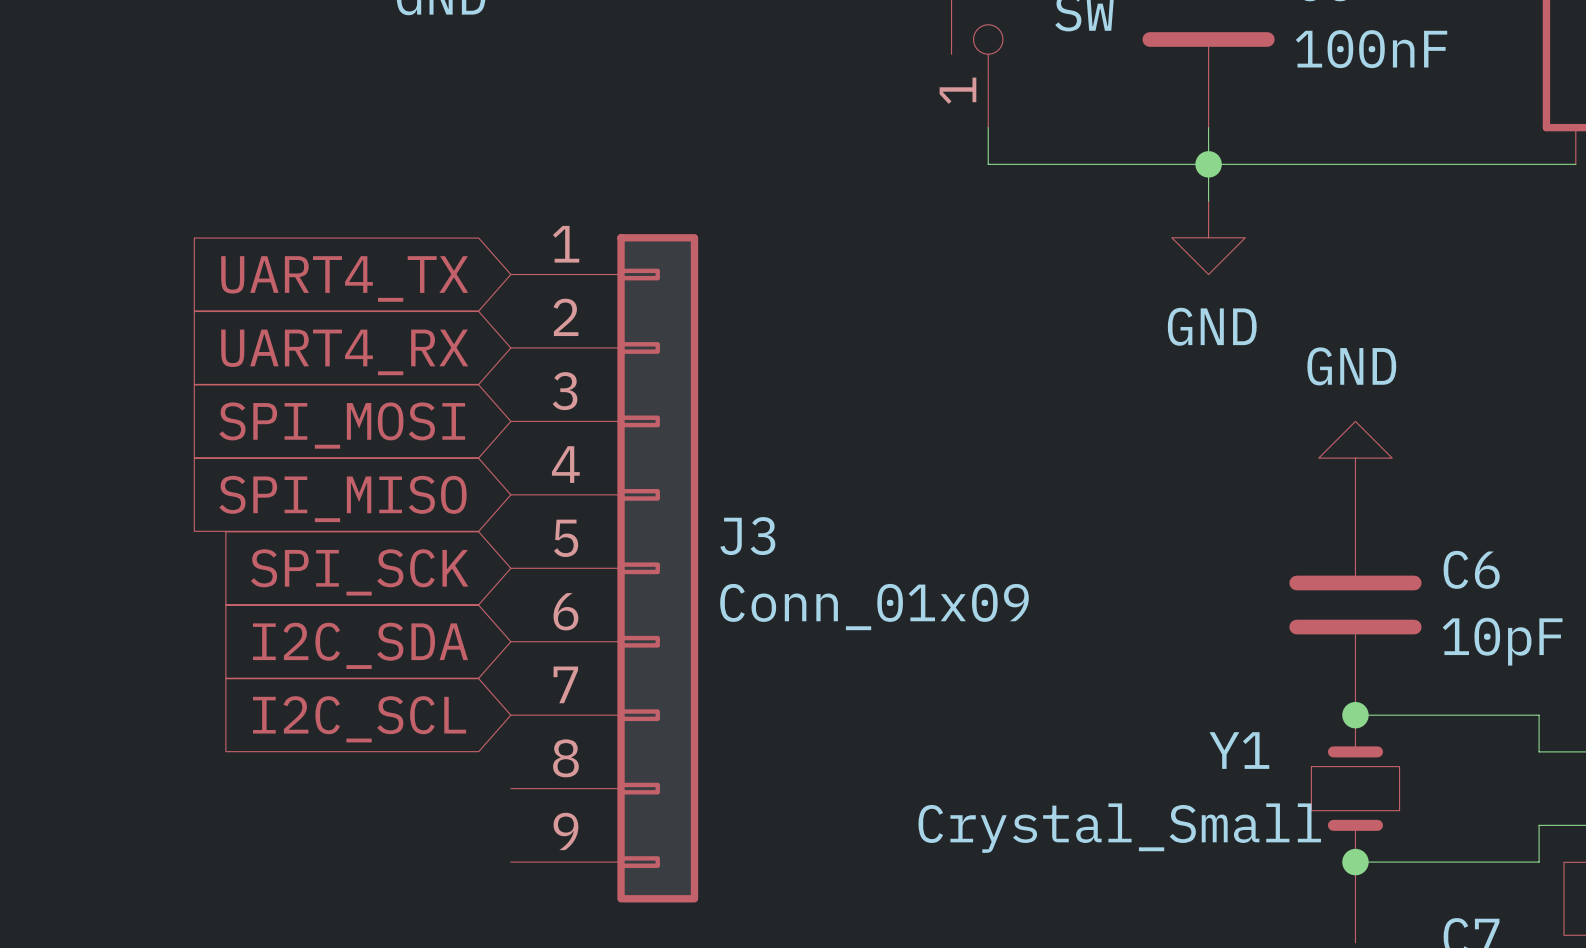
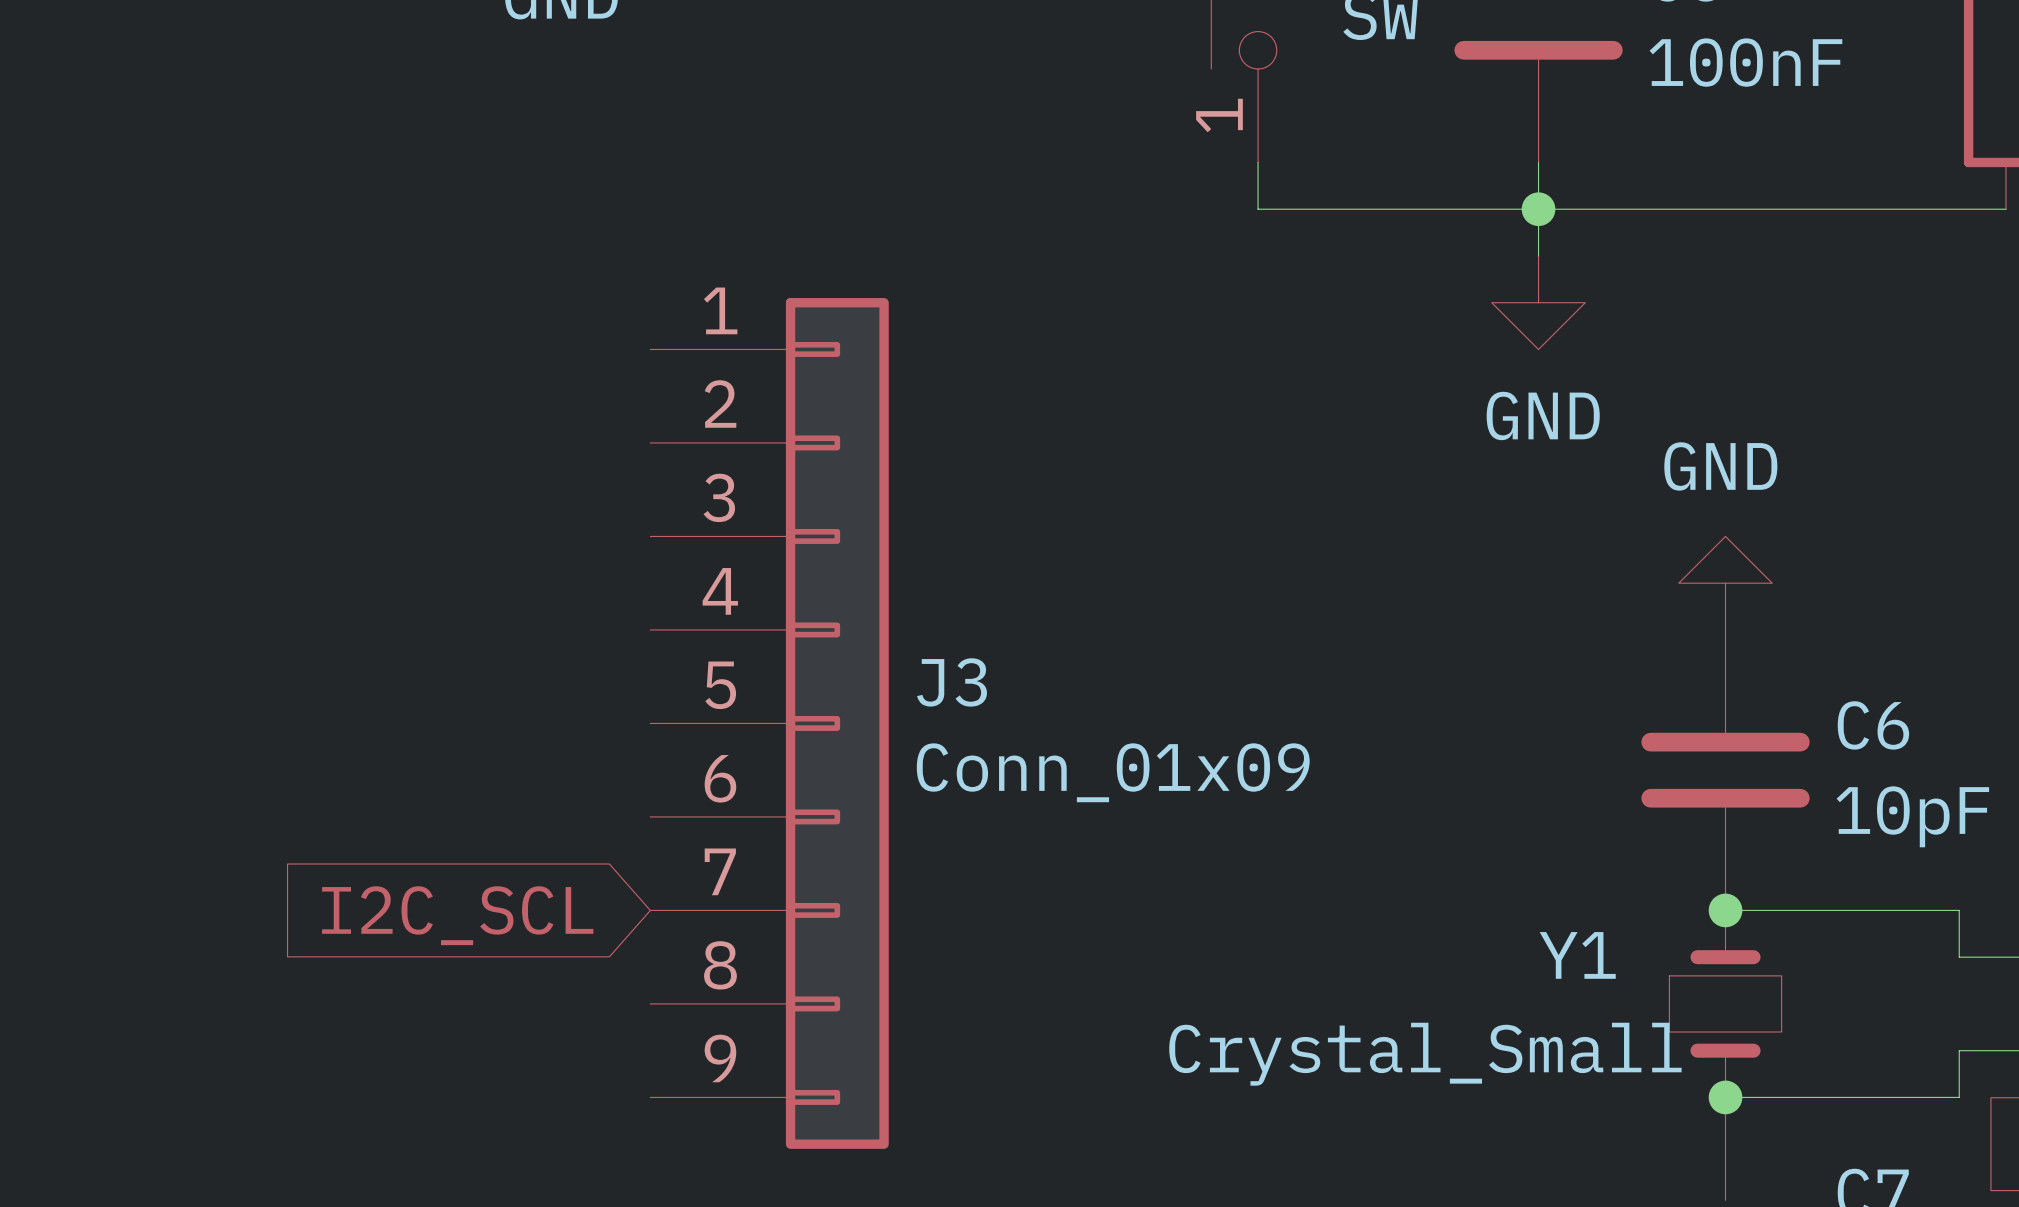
global label: UART4_TX (344, 278) -> none
global label: UART4_RX (344, 352) -> none
global label: SPI_MOSI (342, 425) -> none
global label: SPI_MISO (342, 498) -> none
global label: SPI_SCK (359, 572) -> none
global label: I2C_SDA (360, 645) -> none

